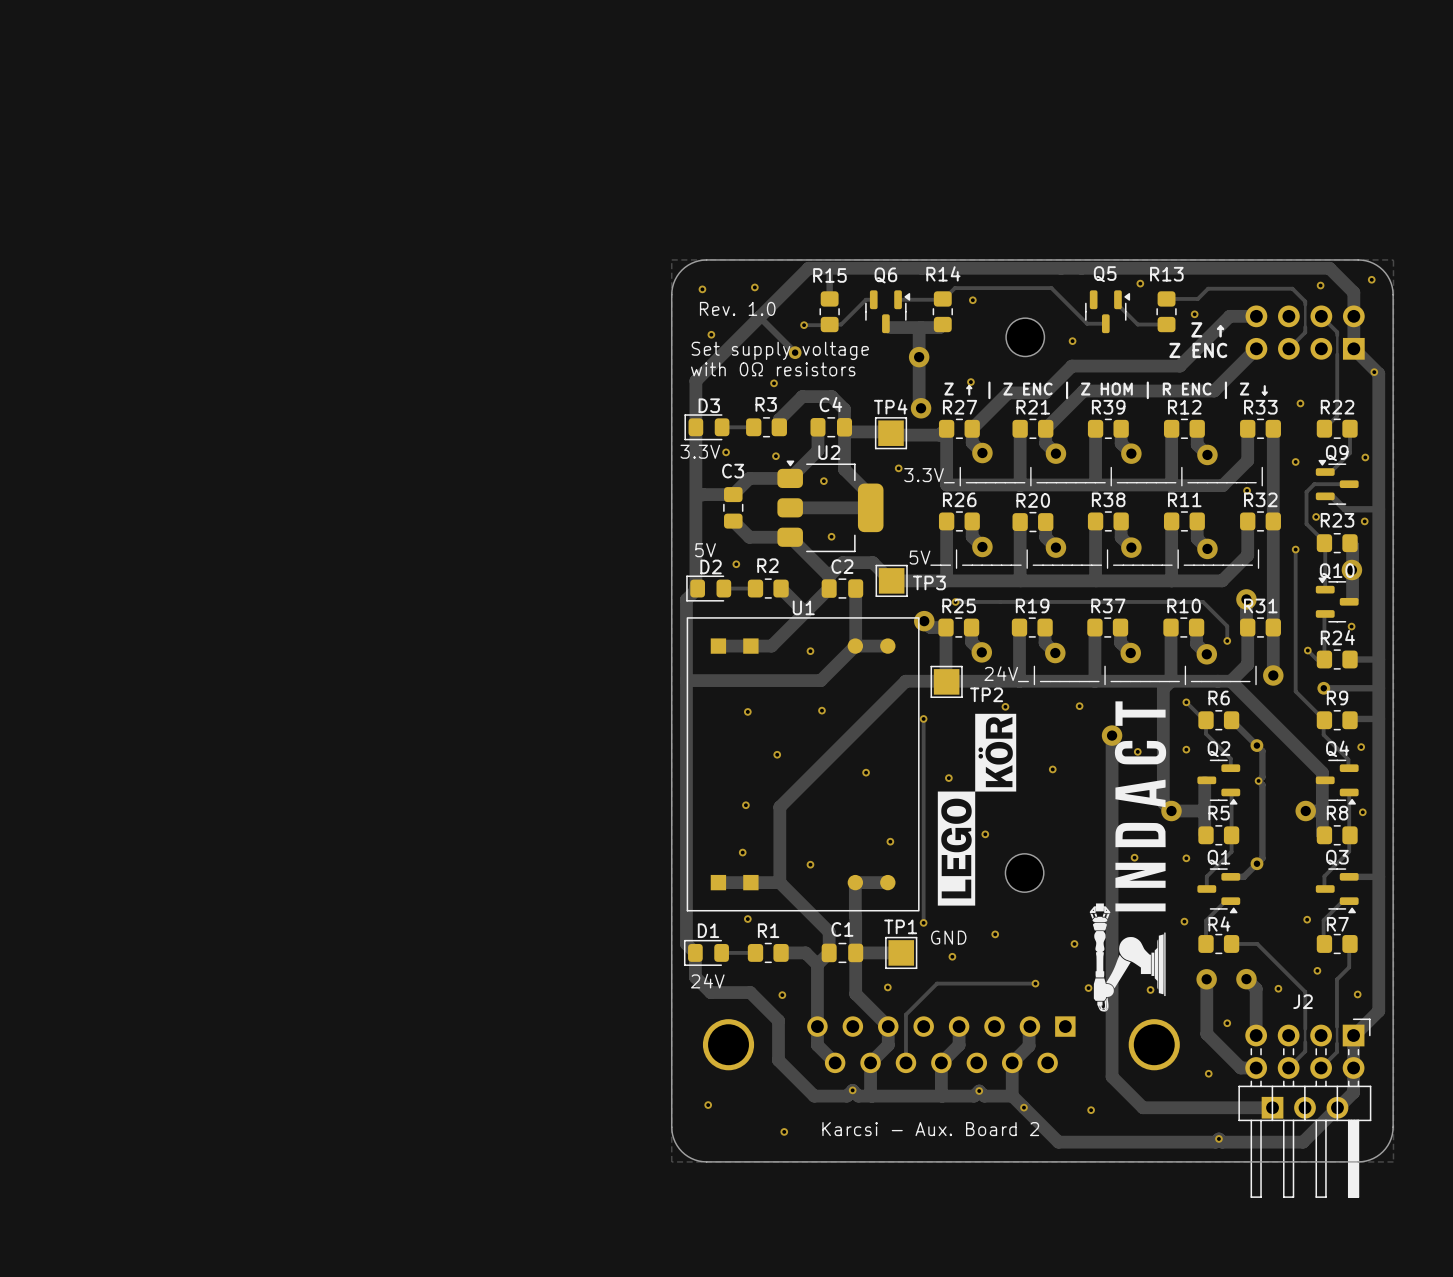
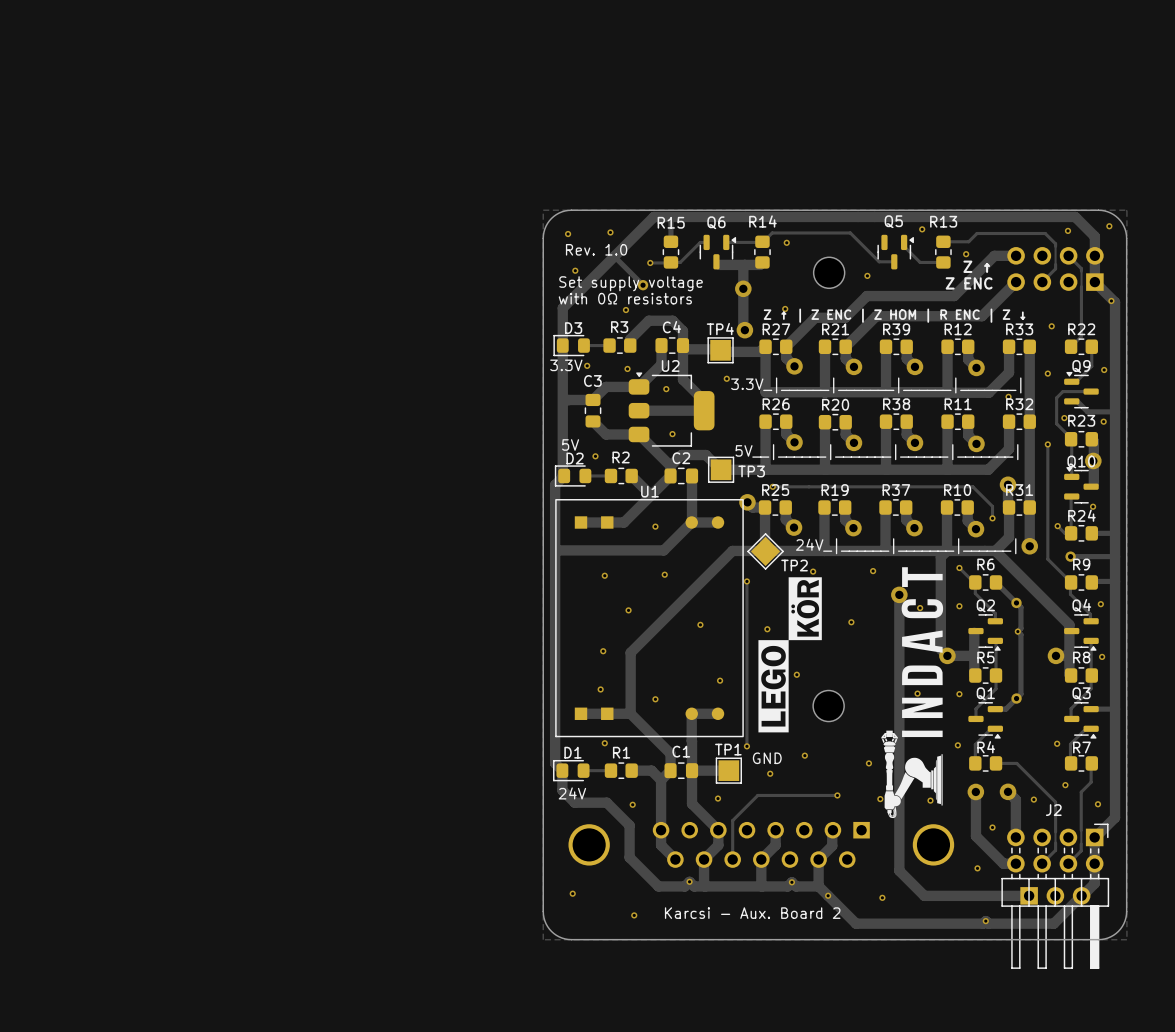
TP2 rotation: 0° (946, 681) -> 45° clockwise (765, 551)

